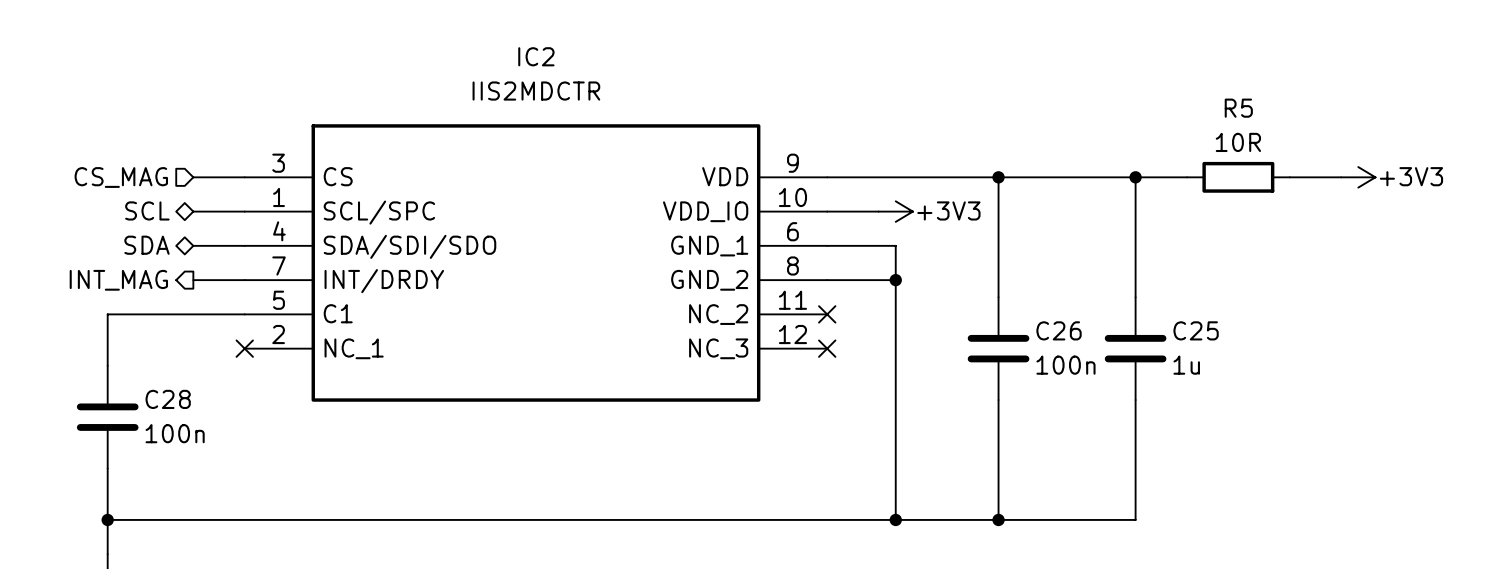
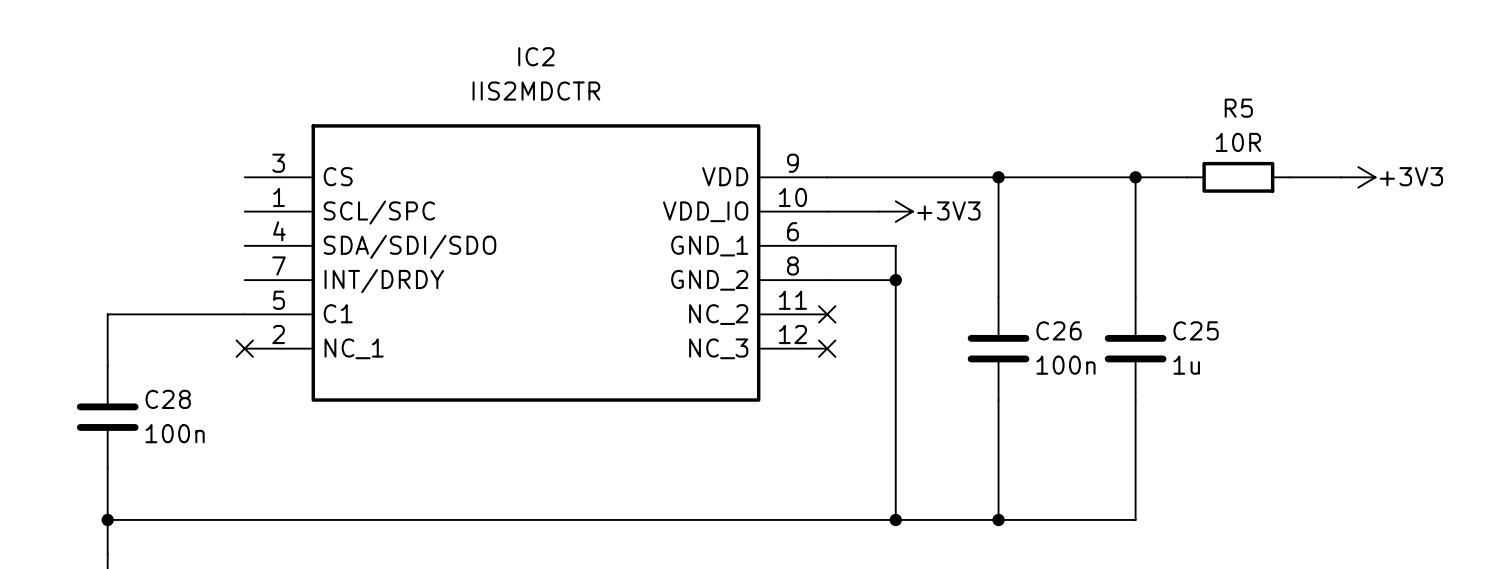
hierarchical label: CS_MAG (121, 177) -> none
wire: (193, 177) (244, 177) -> none
hierarchical label: SCL (147, 210) -> none
wire: (193, 211) (244, 211) -> none
hierarchical label: SDA (146, 245) -> none
wire: (193, 245) (244, 245) -> none
hierarchical label: INT_MAG (118, 280) -> none
wire: (193, 280) (244, 280) -> none

